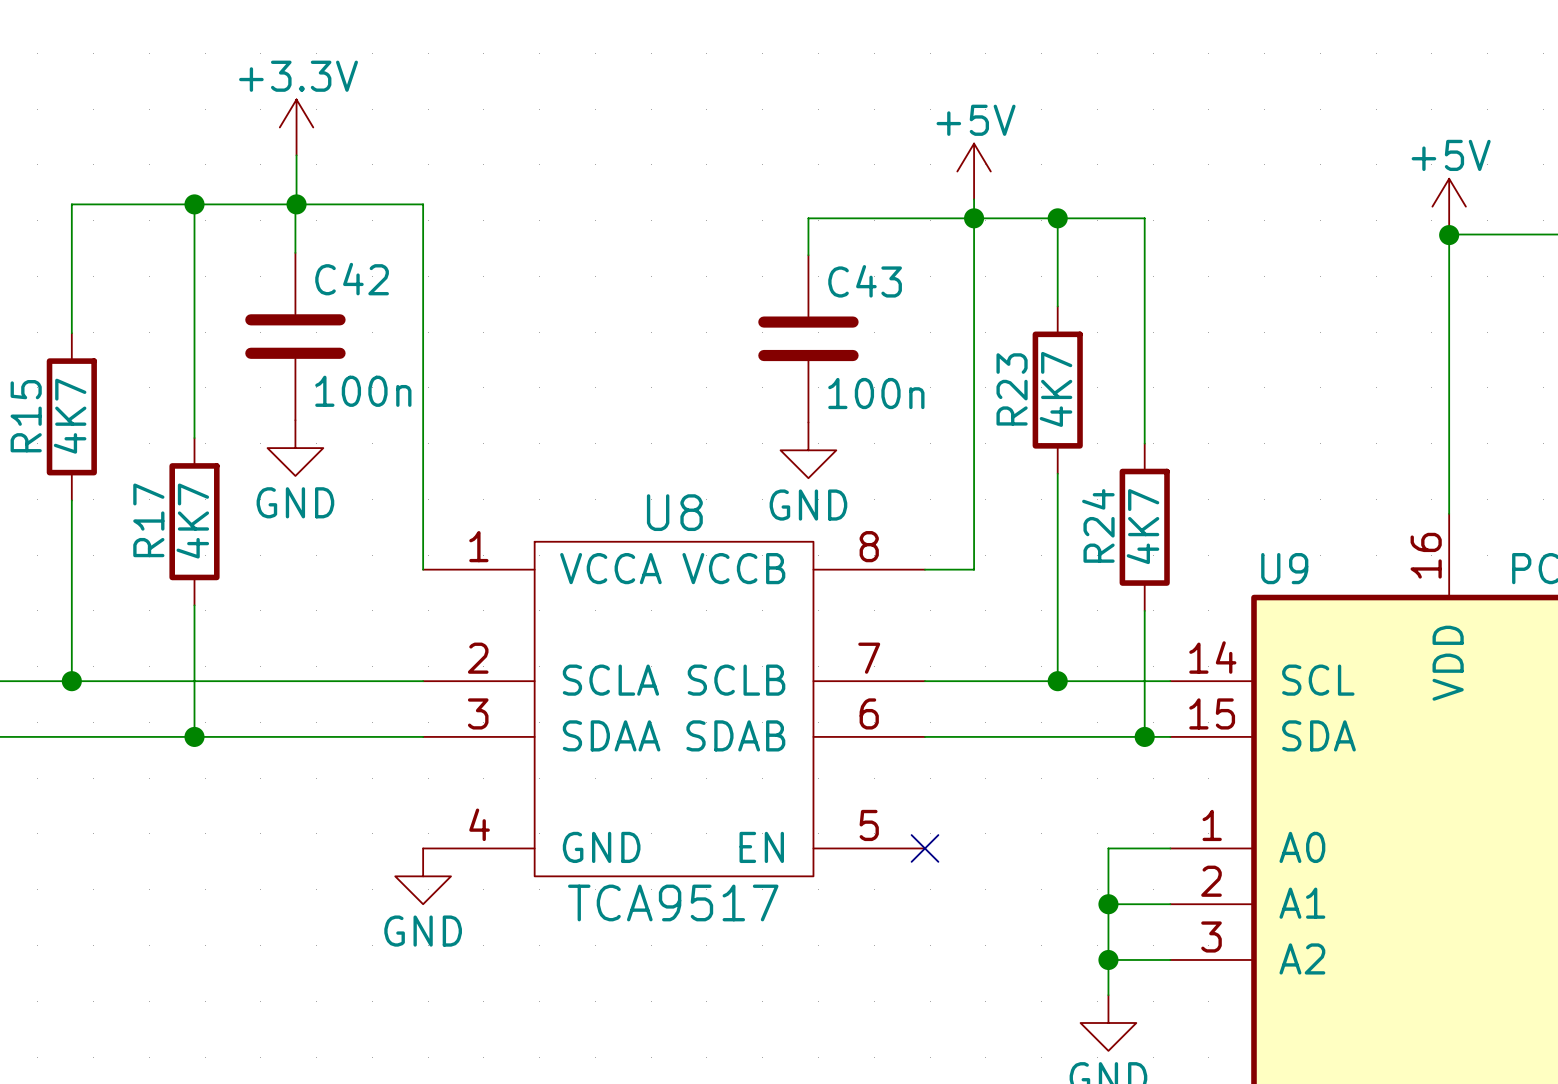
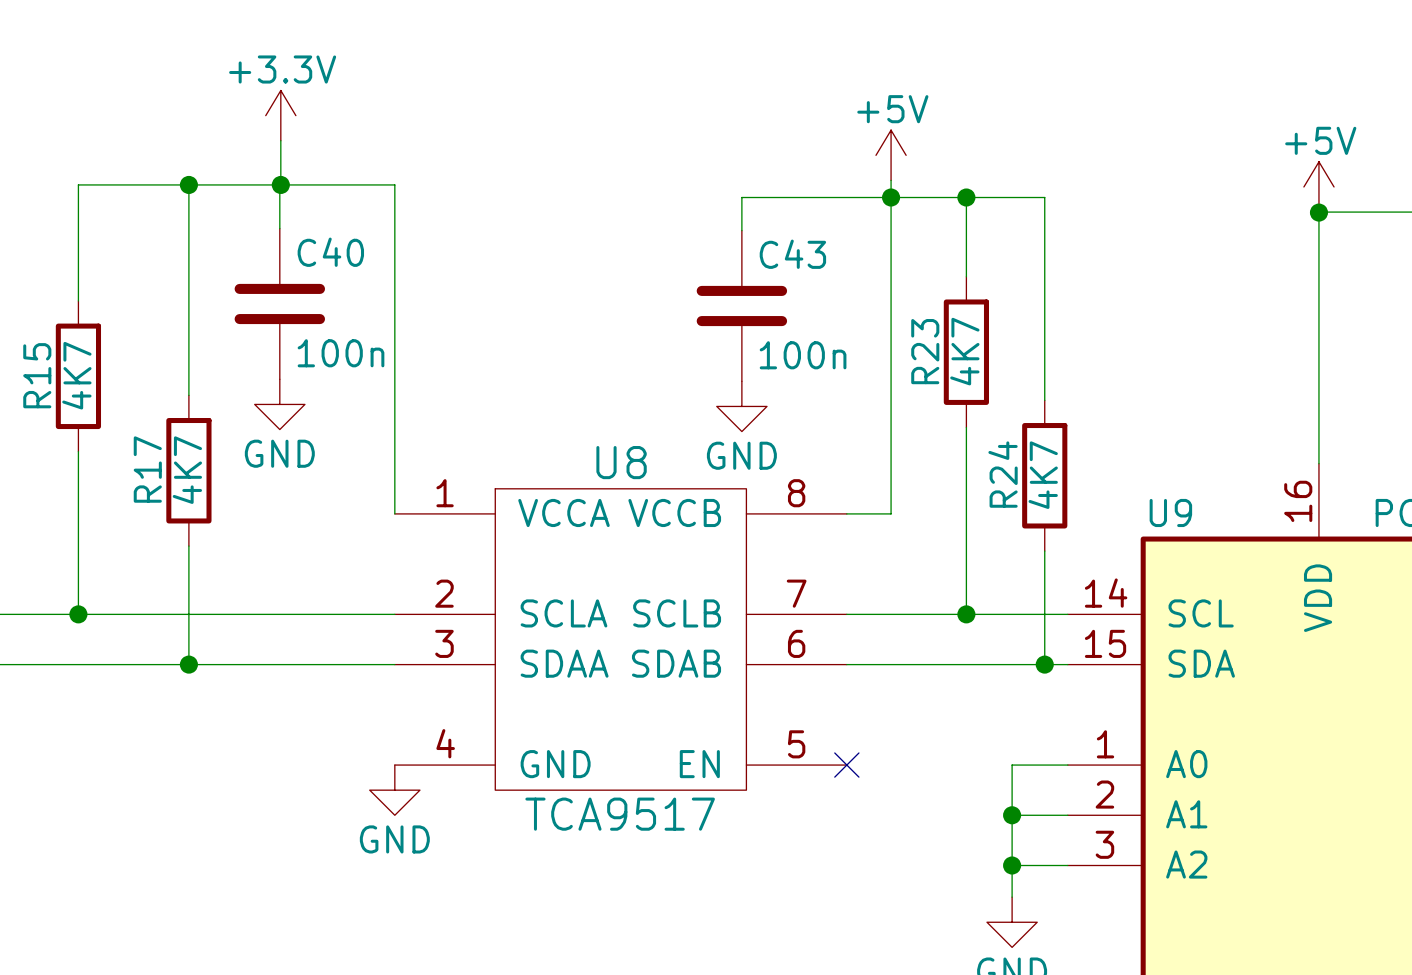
C42 name: C42 (352, 279) -> C40 (330, 252)

